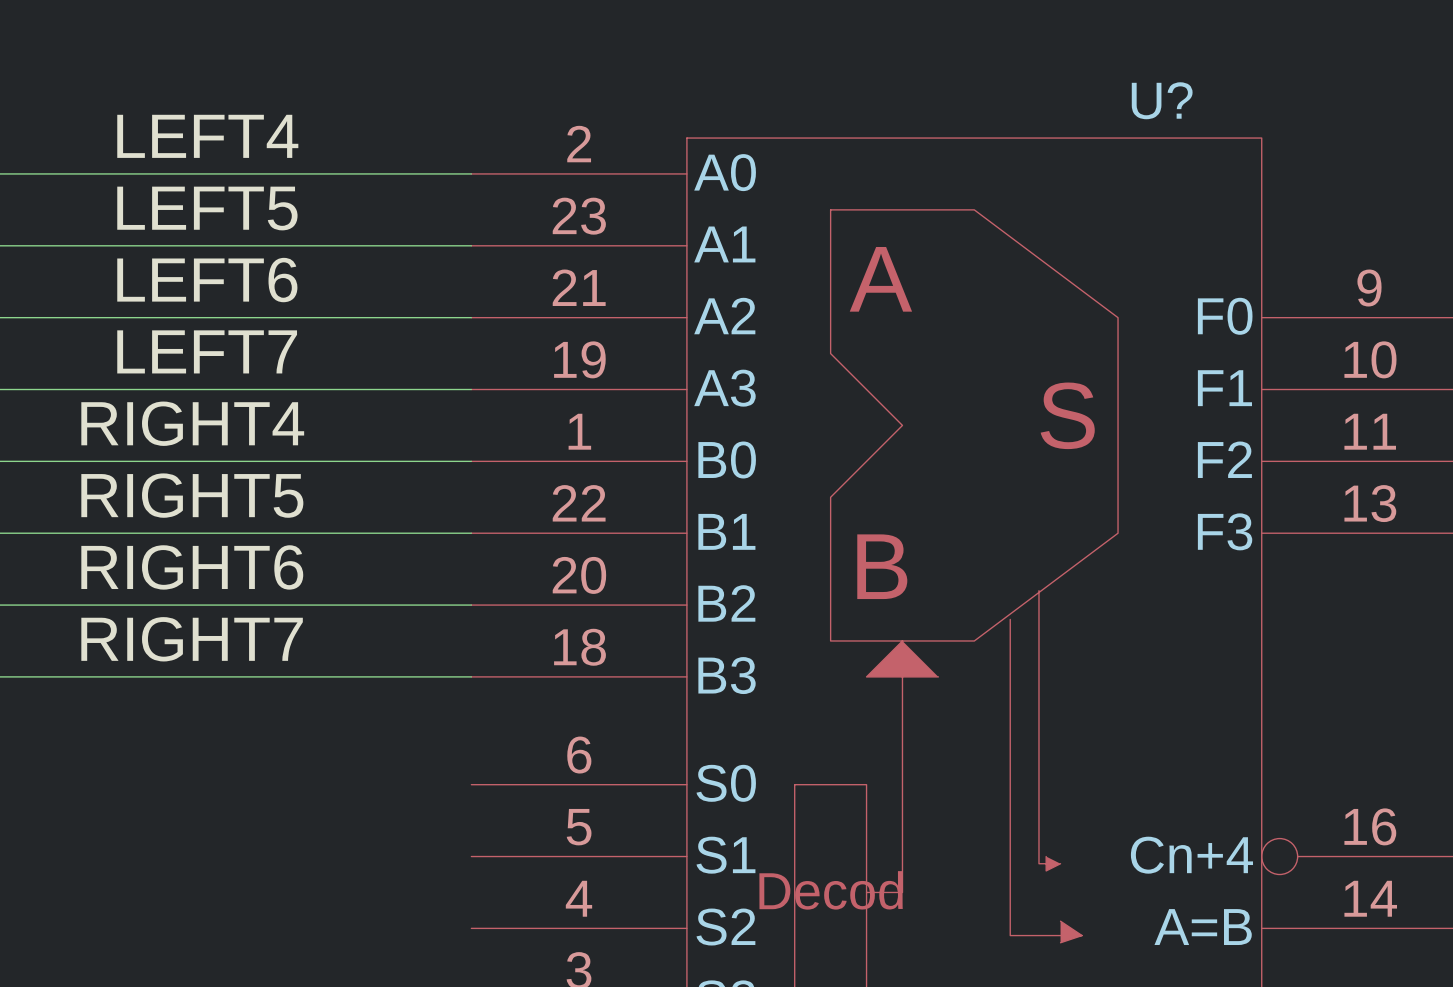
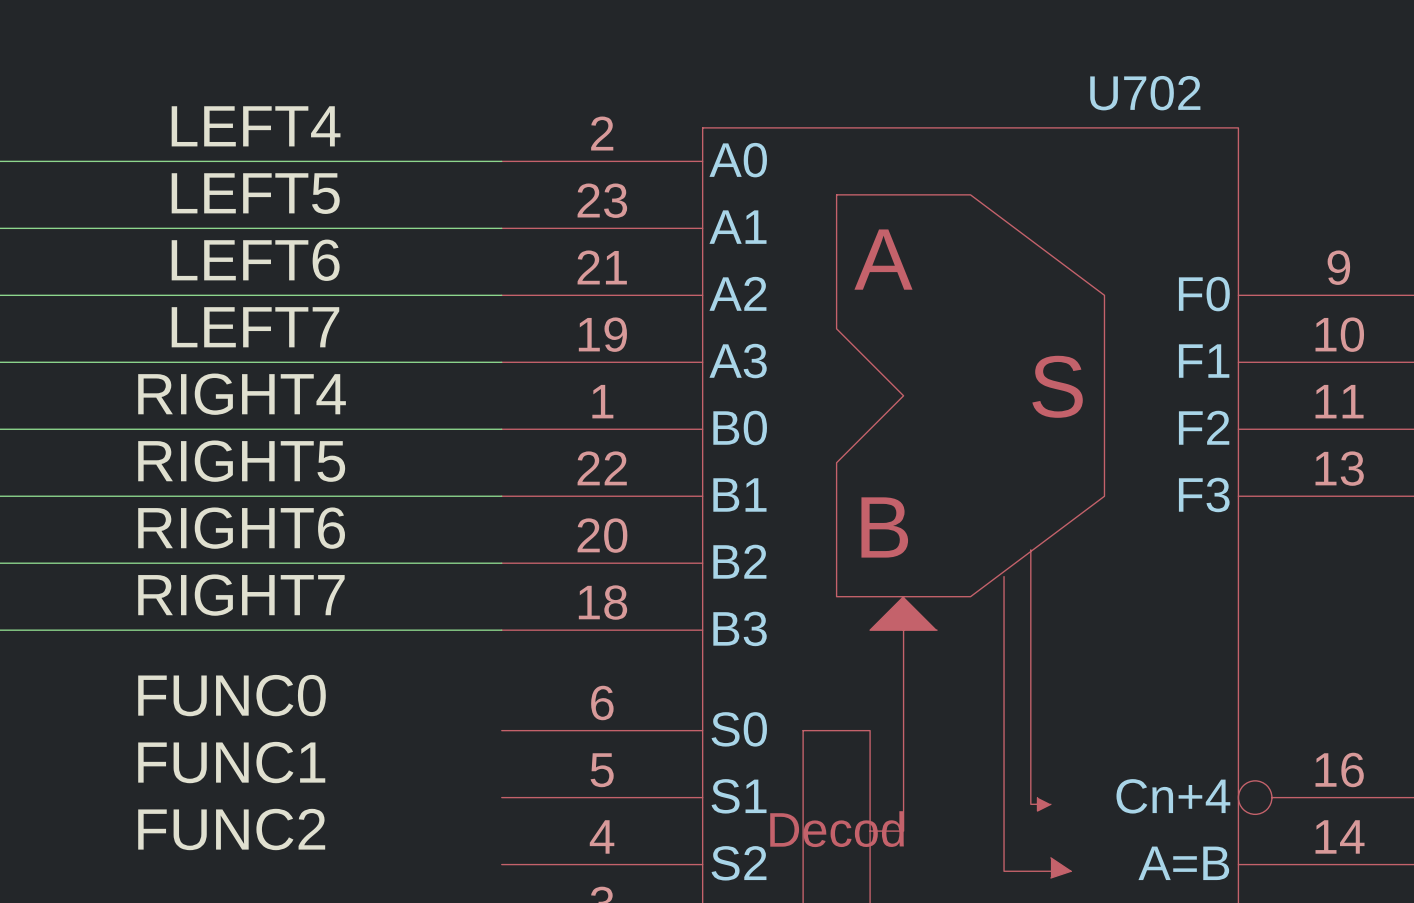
U? name: U? (1162, 100) -> U702 (1145, 93)
label: none -> FUNC0 (232, 695)
label: none -> FUNC1 (231, 762)
label: none -> FUNC2 (231, 829)

